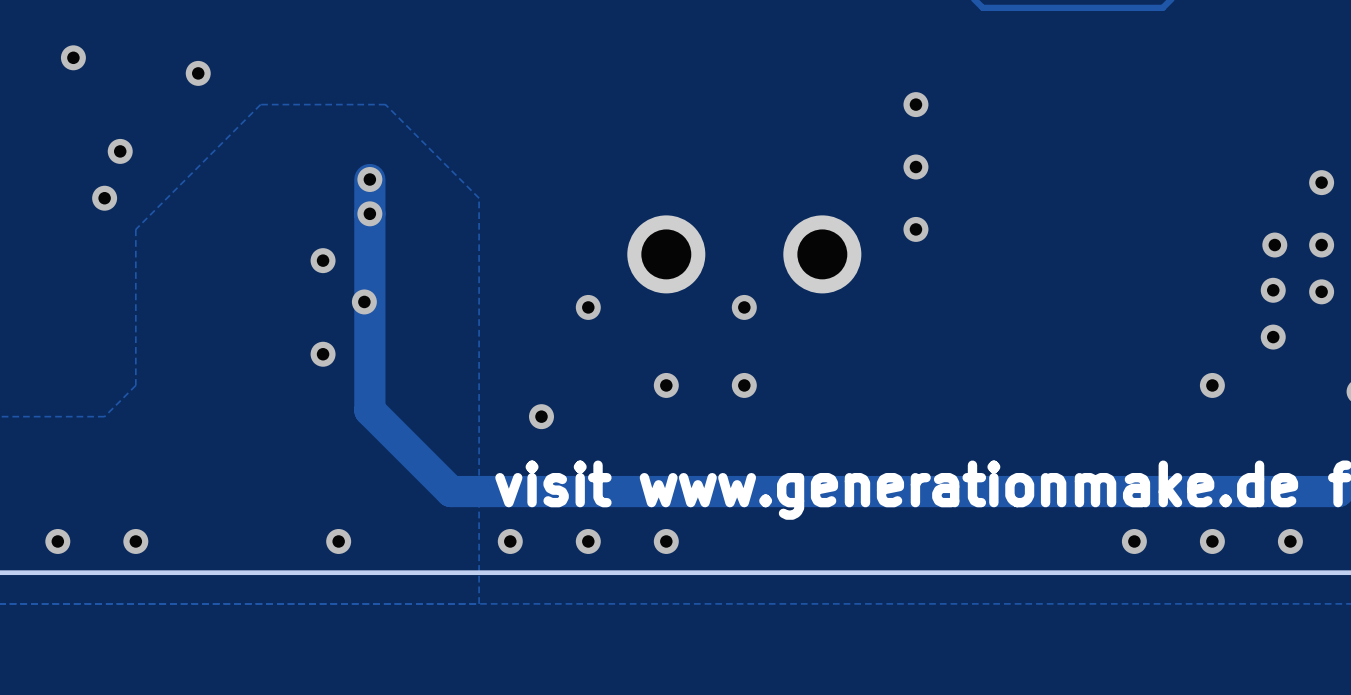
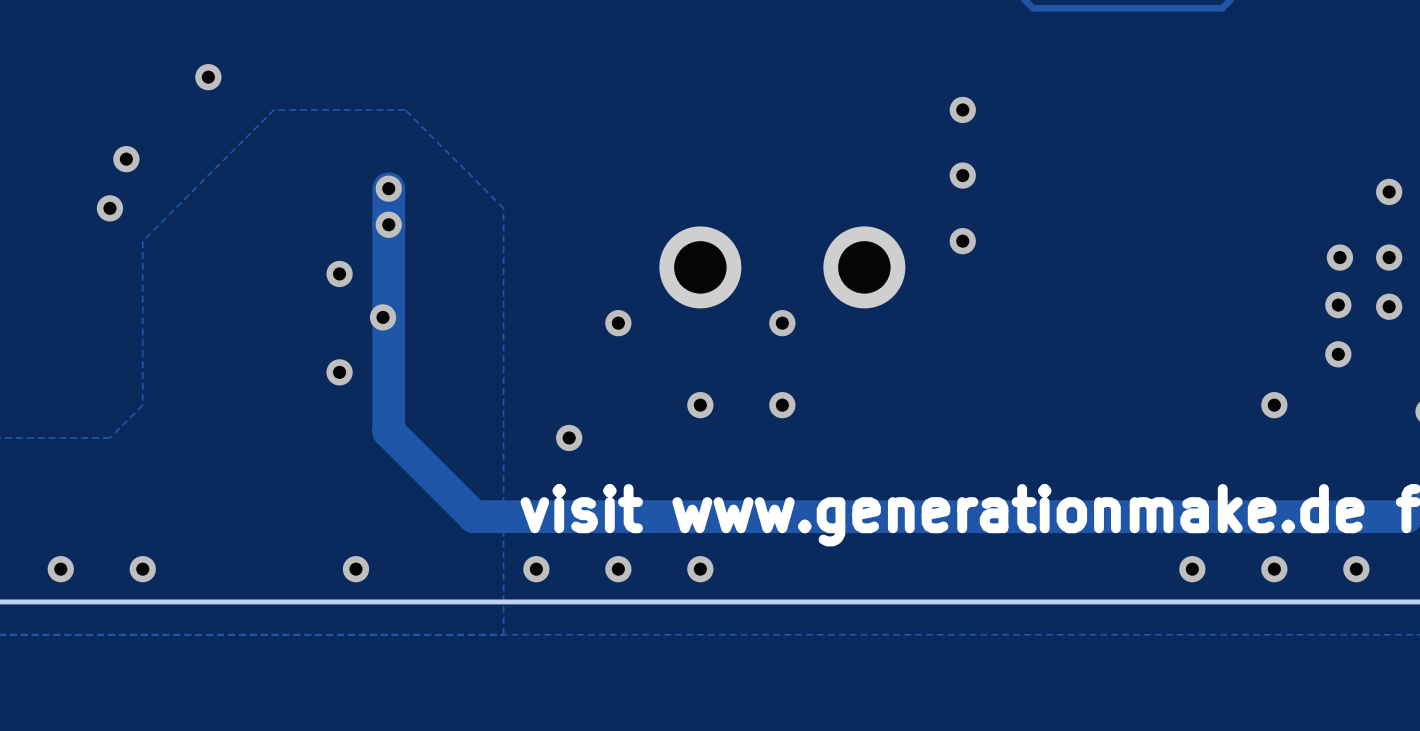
via: (73, 57) -> none

